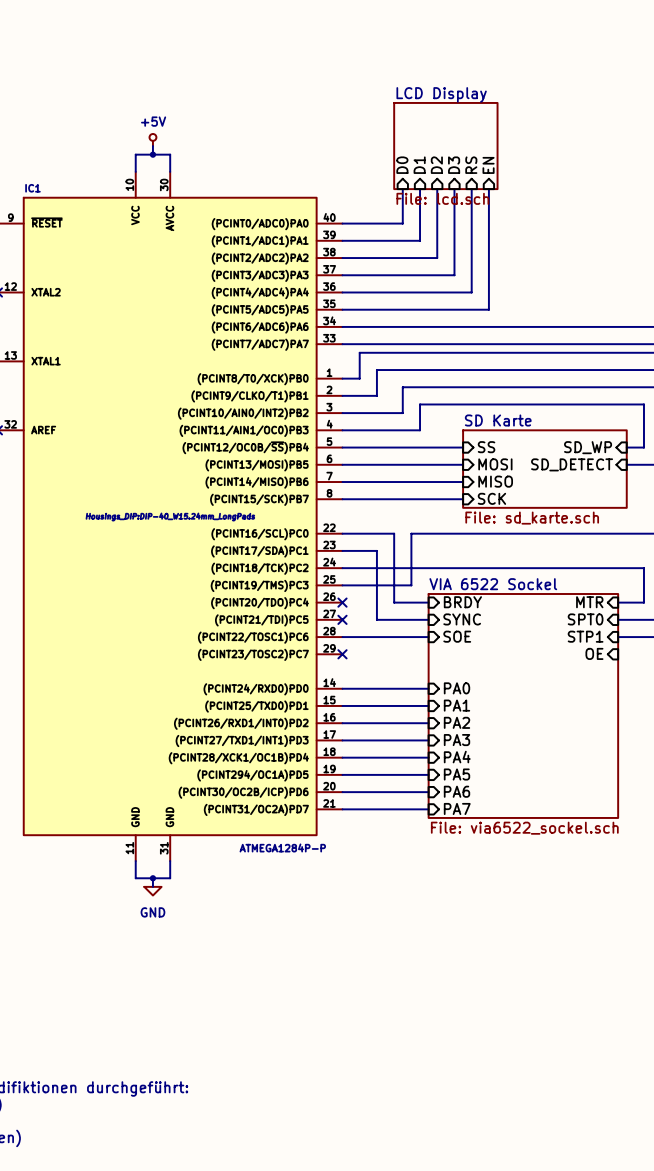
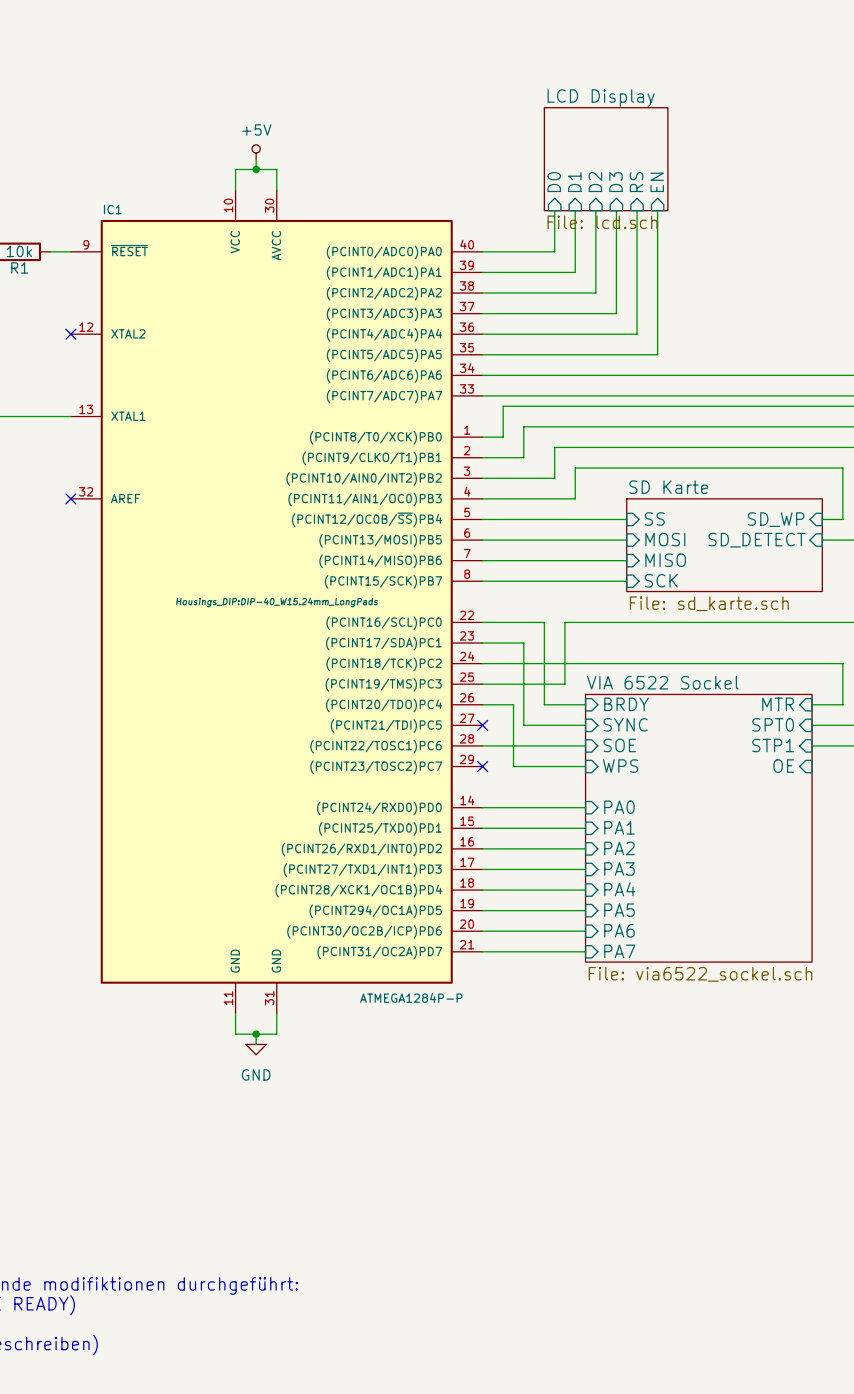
wire: none -> (482, 704) (513, 704) (513, 766) (585, 766)
no-connect mark: (342, 602) -> none
sheet pin: none -> WPS (620, 766)

